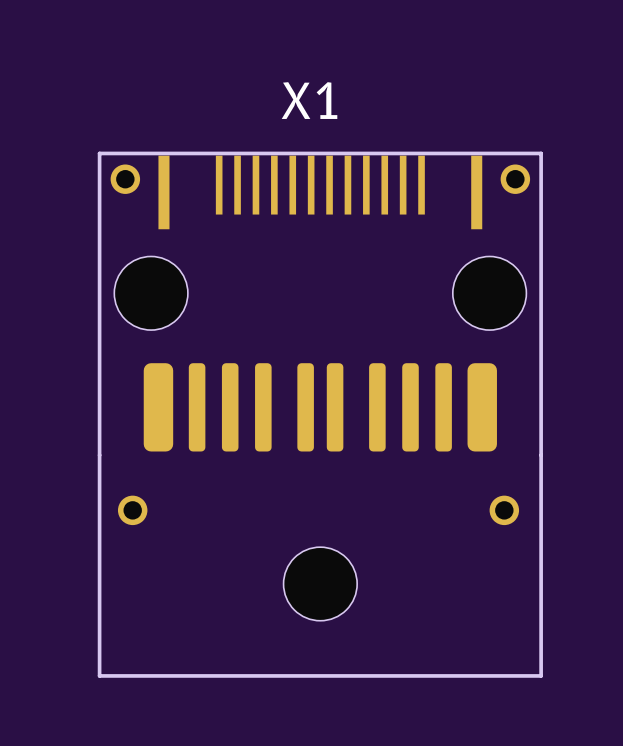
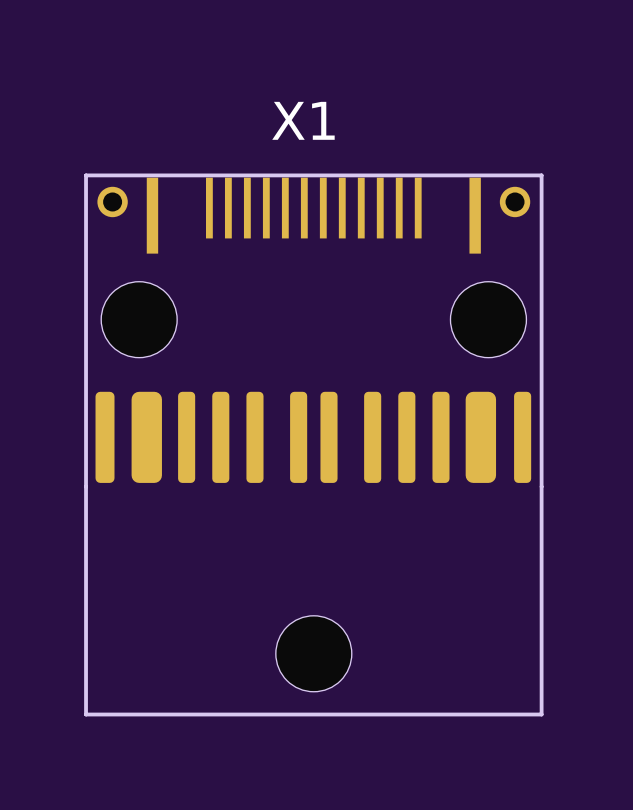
part: none -> (105, 437)
part: none -> (522, 437)
part: (132, 510) -> none
part: (504, 510) -> none
part position: (320, 583) -> (313, 653)

